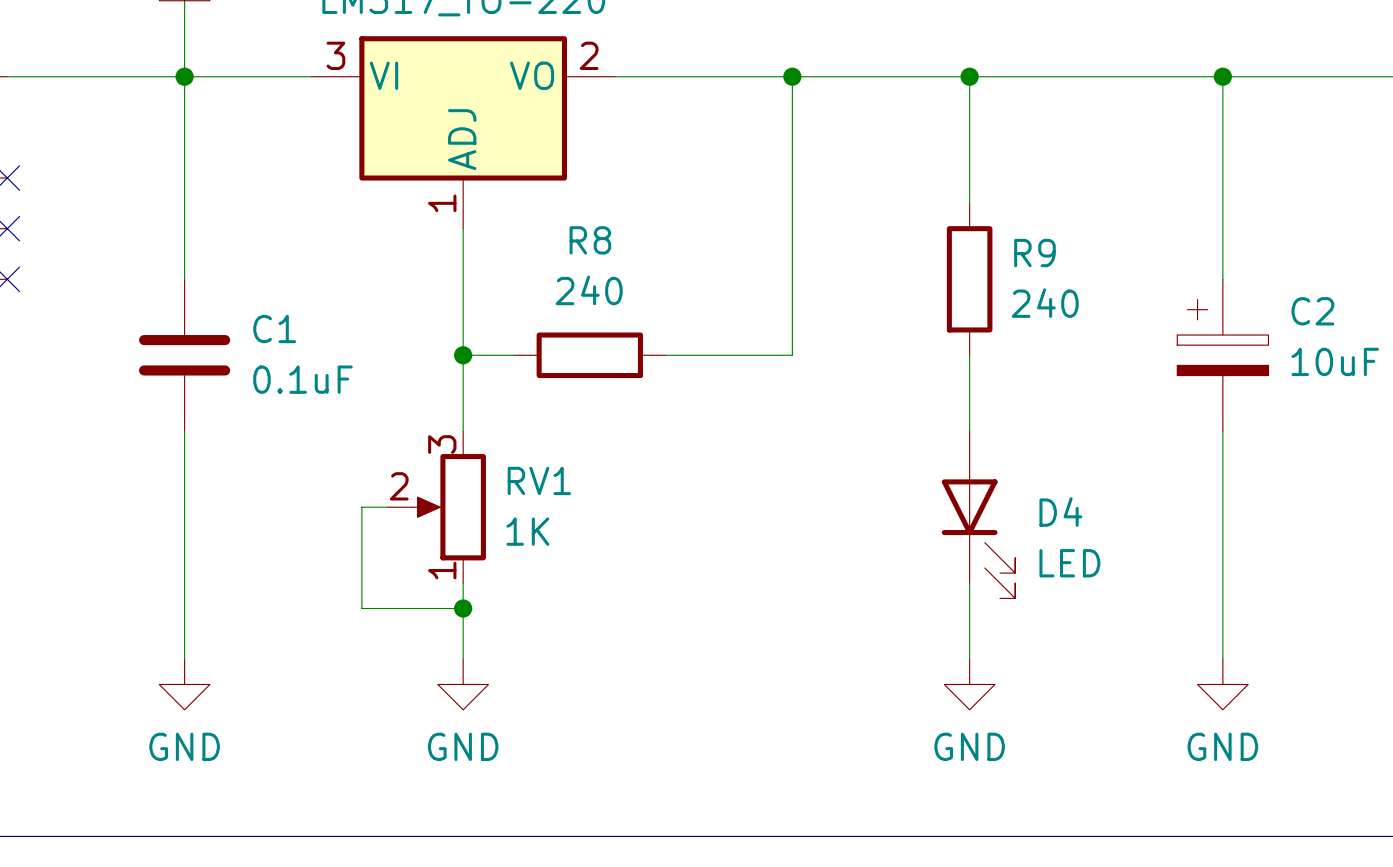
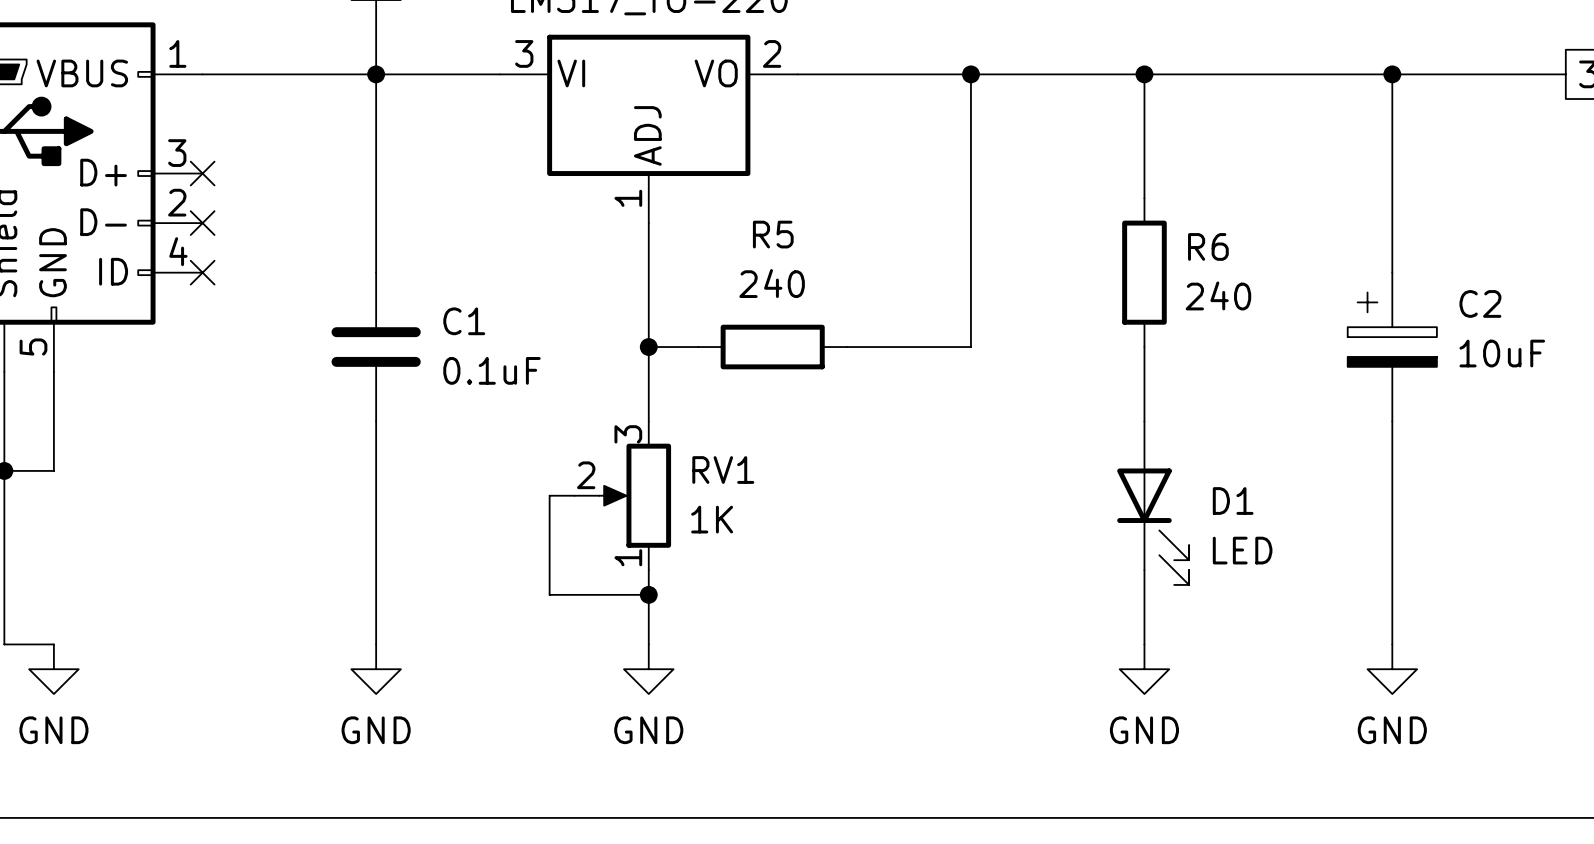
R8 name: R8 (590, 240) -> R5 (773, 234)
R9 name: R9 (1034, 253) -> R6 (1208, 246)
D4 name: D4 (1060, 512) -> D1 (1233, 501)

